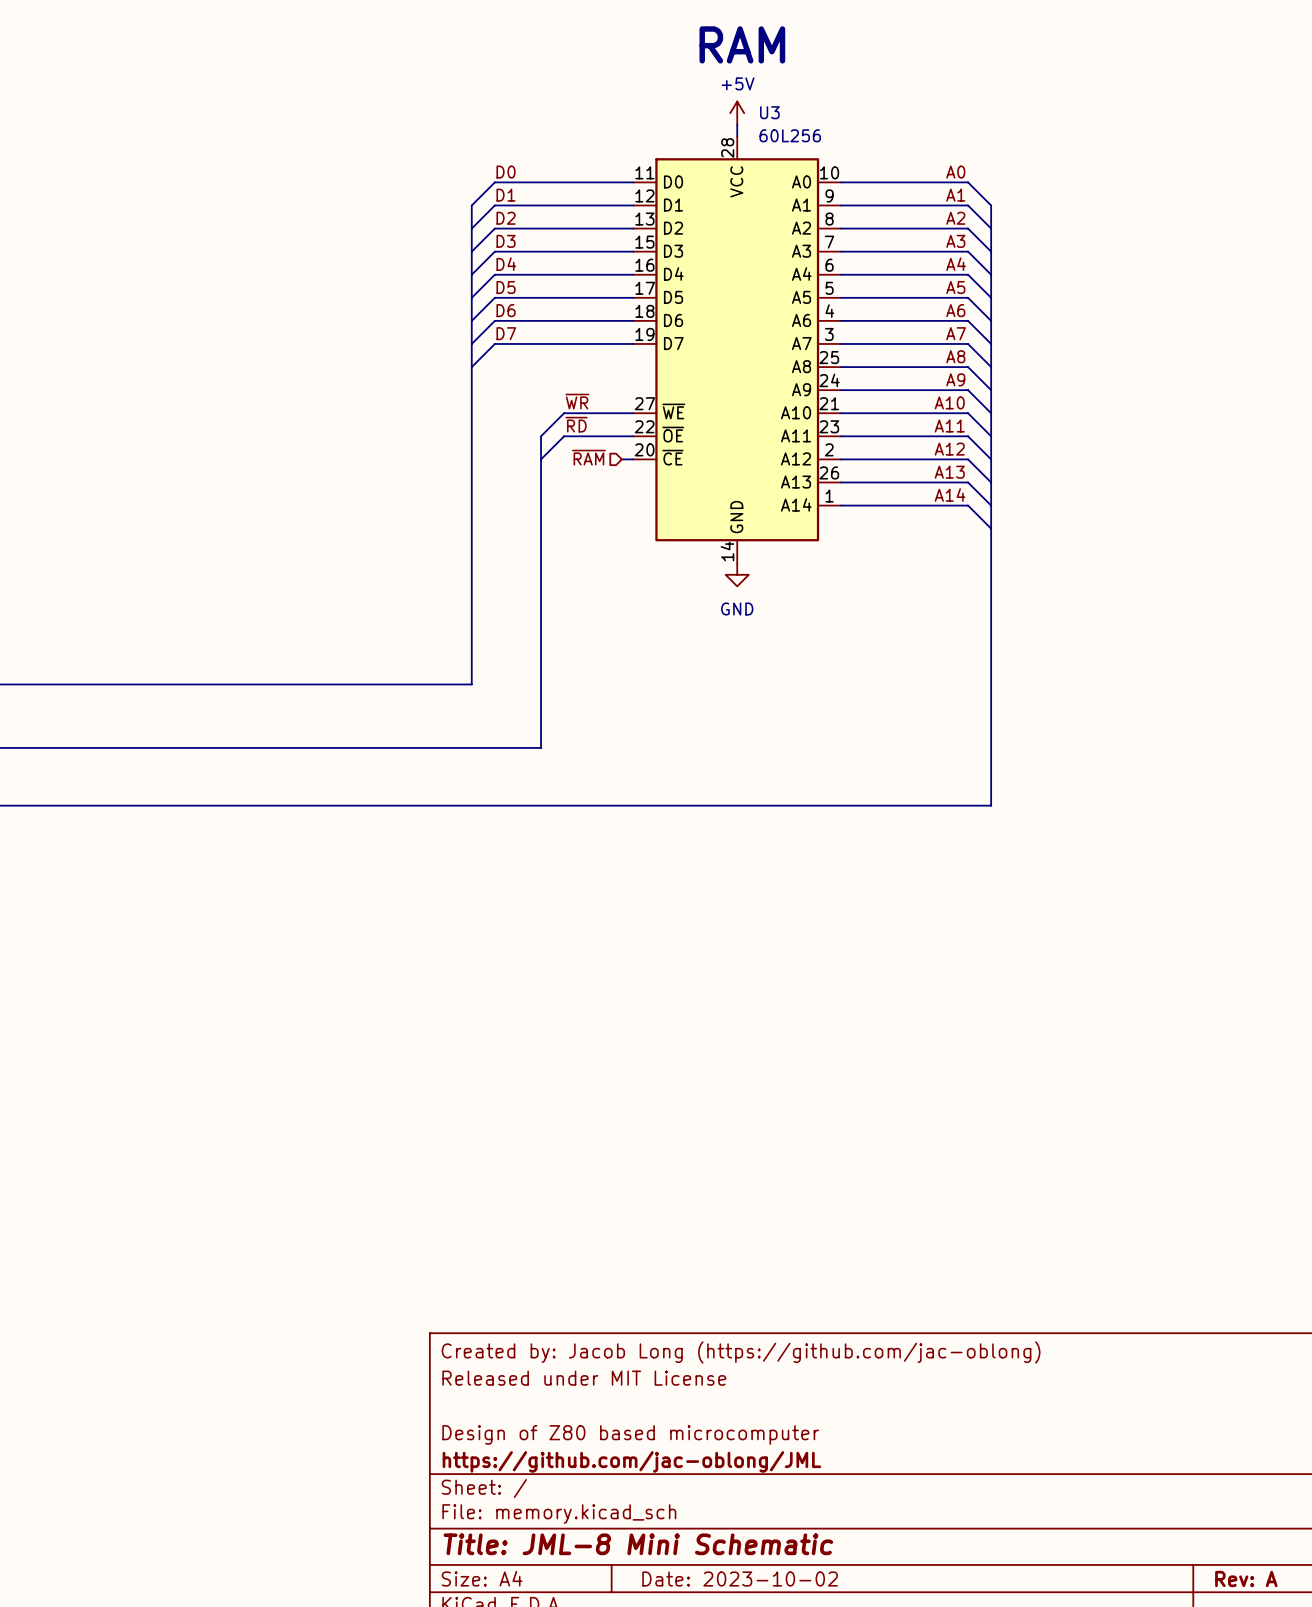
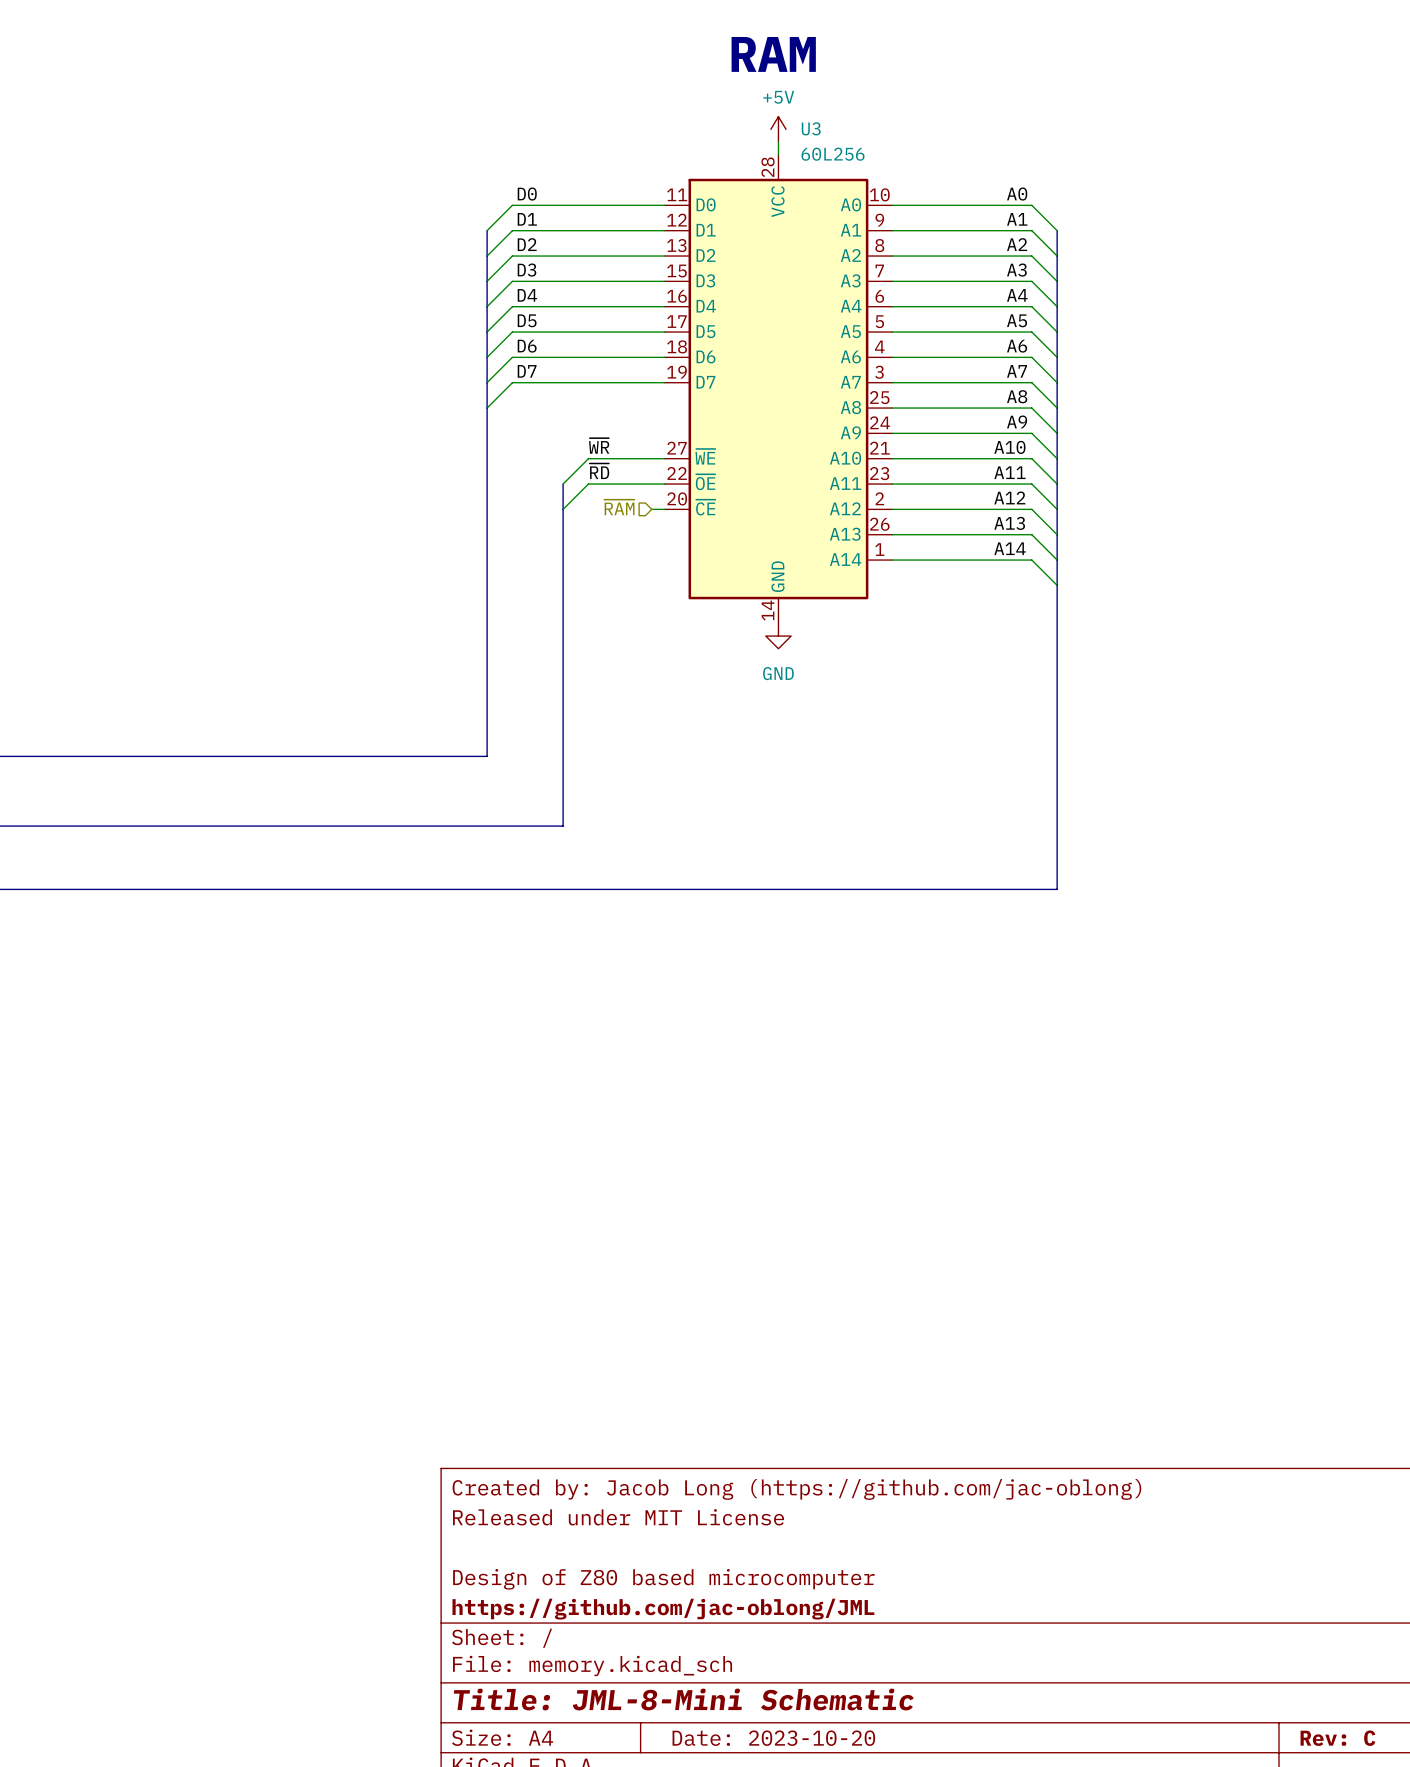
title block: Title: JML-8 Mini Schematic (638, 1544) -> Title: JML-8-Mini Schematic (683, 1699)
title block: Date: 2023-10-02 (740, 1579) -> Date: 2023-10-20 (773, 1738)
title block: Rev: A (1246, 1579) -> Rev: C (1337, 1738)

